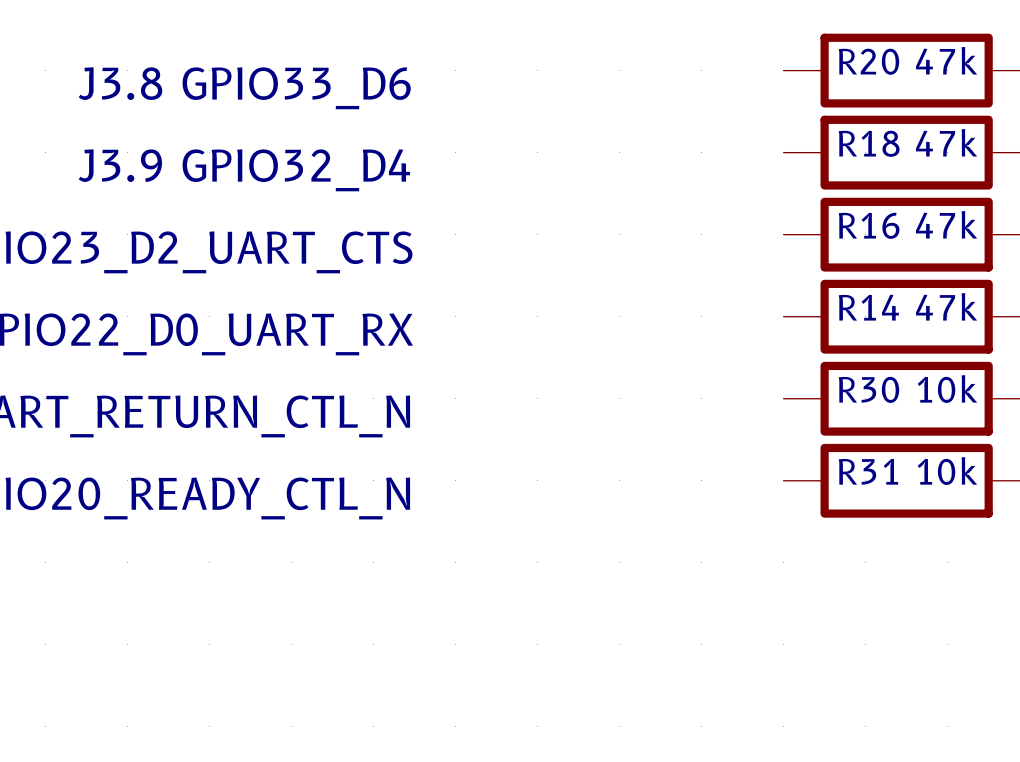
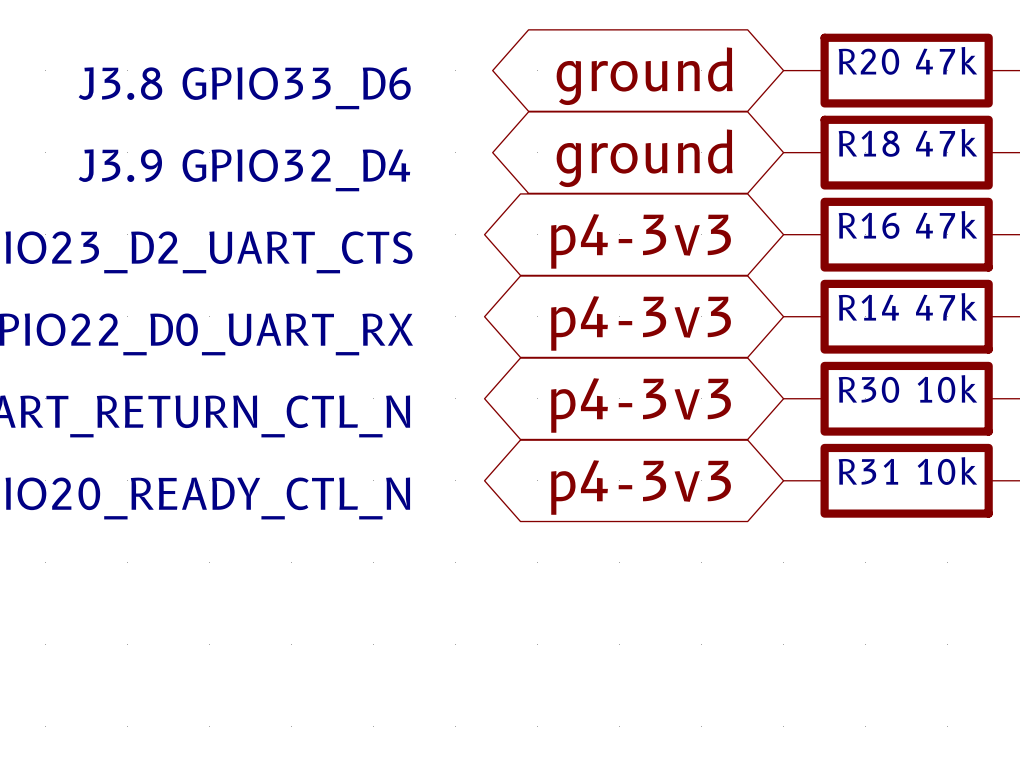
global label: none -> ground (644, 76)
global label: none -> ground (644, 158)
global label: none -> p4-3v3 (641, 241)
global label: none -> p4-3v3 (641, 323)
global label: none -> p4-3v3 (641, 405)
global label: none -> p4-3v3 (641, 487)

